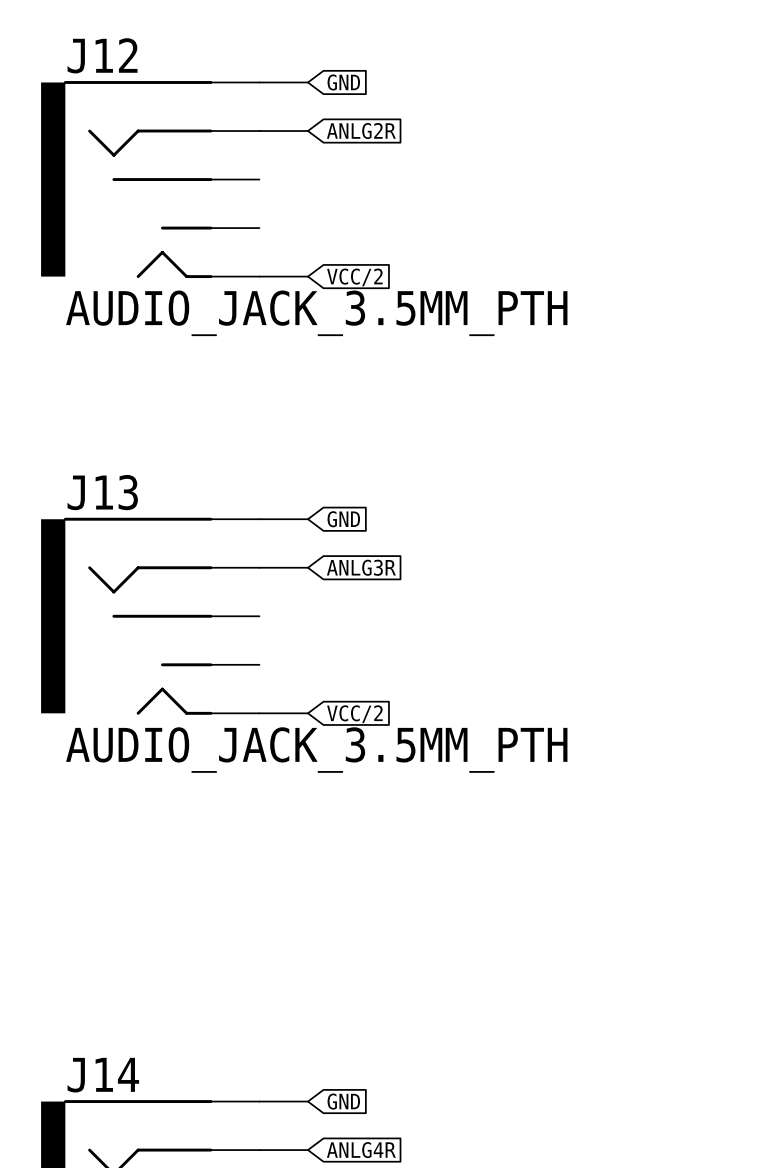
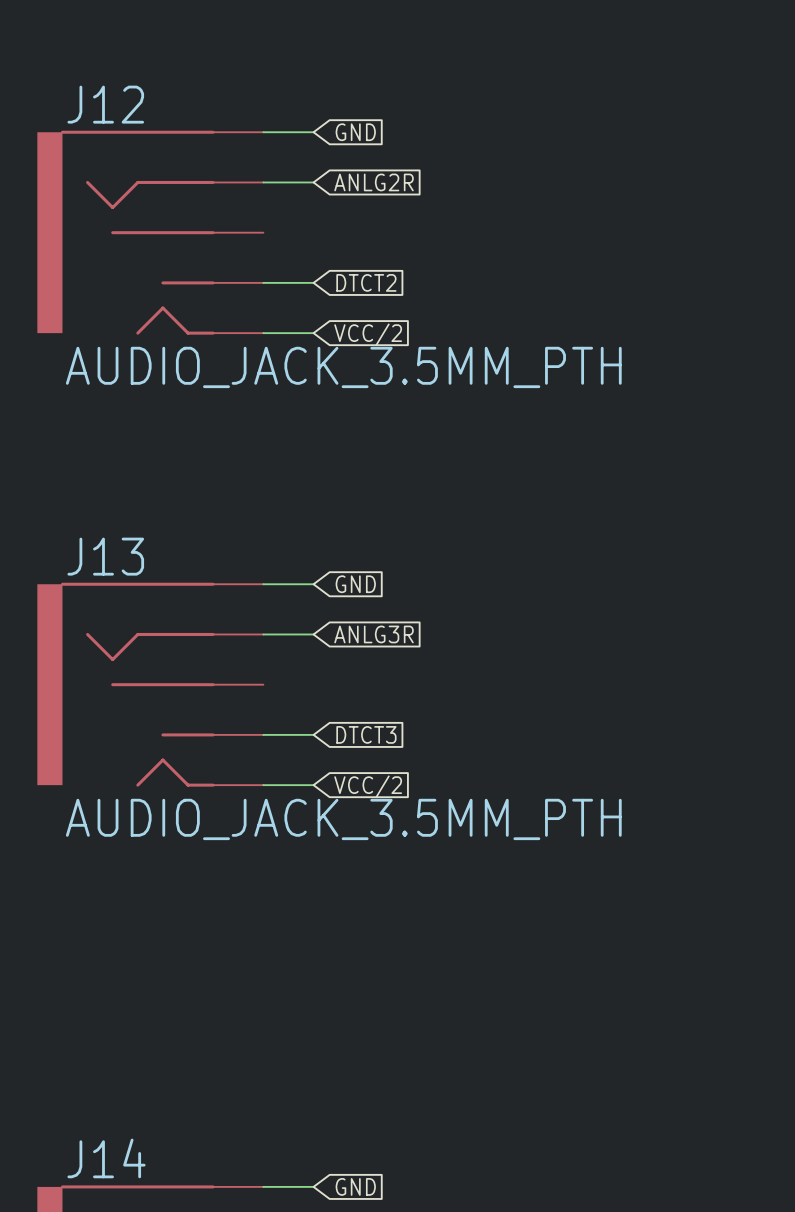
wire: none -> (263, 282) (313, 282)
global label: none -> DTCT2 (366, 282)
wire: none -> (263, 734) (313, 734)
global label: none -> DTCT3 (366, 734)

